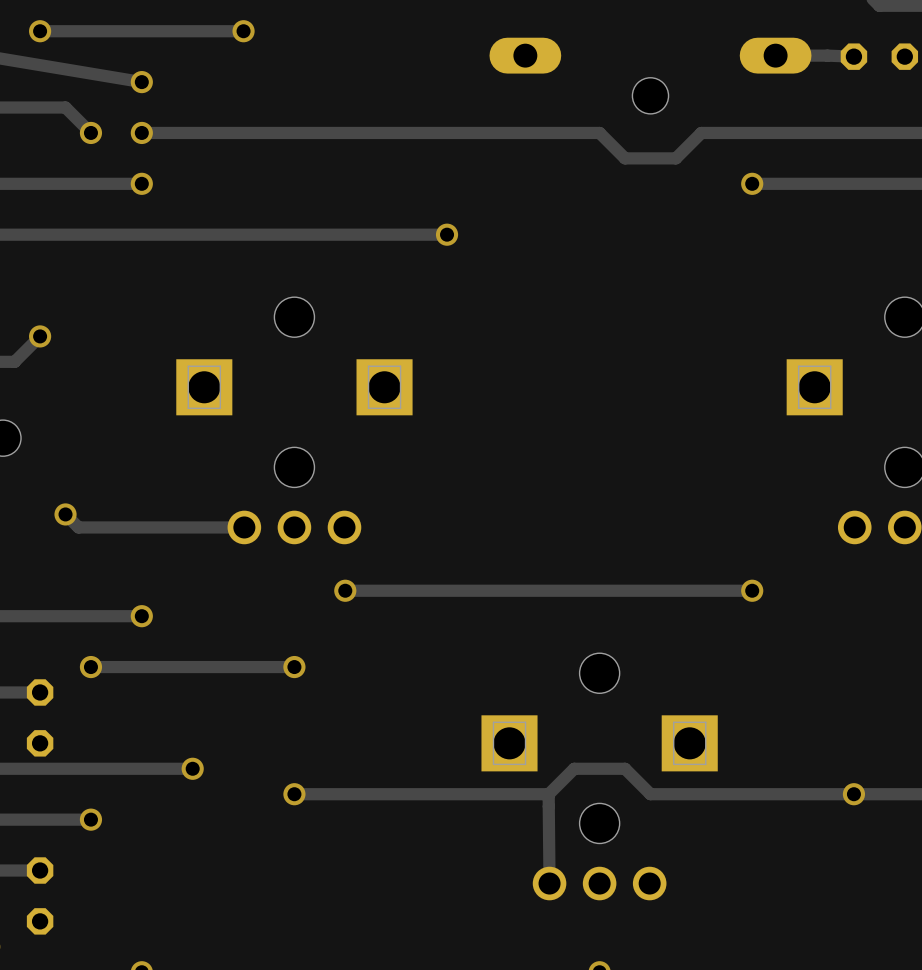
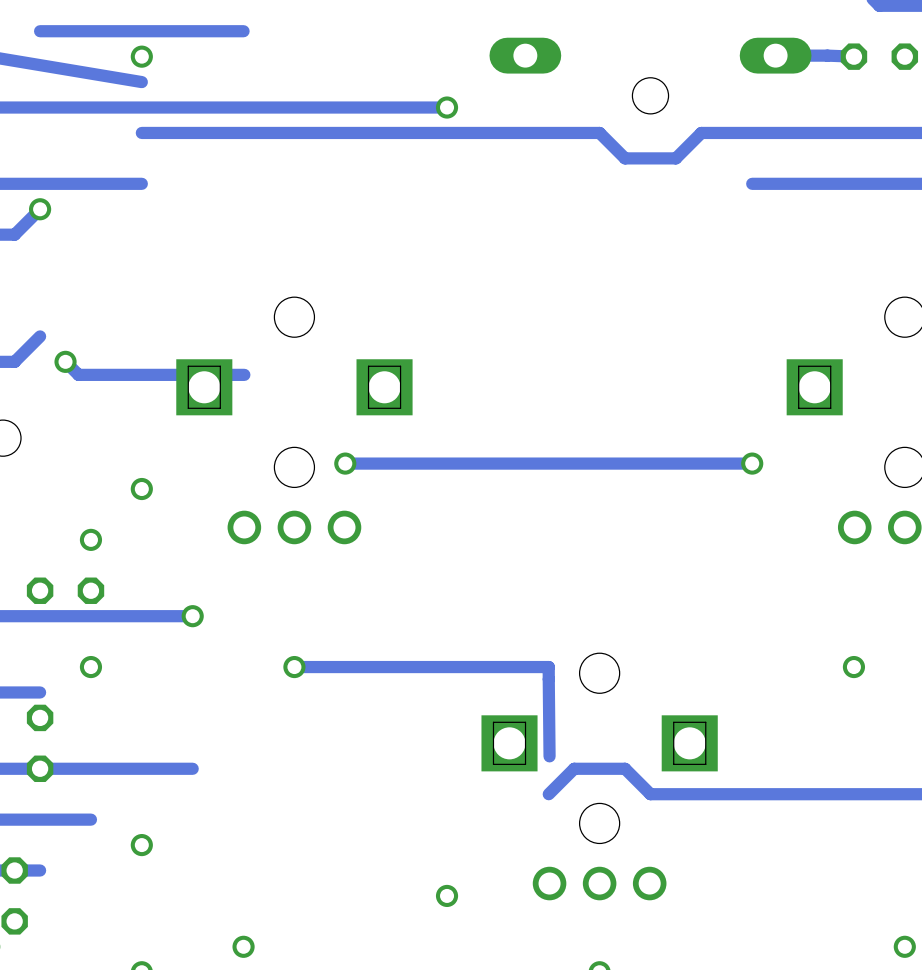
via: (40, 31) -> none
via: (243, 31) -> none
via position: (141, 82) -> (141, 56)
track: (65, 107) (90, 132) -> (65, 107) (447, 107)
via: none -> (447, 107)
via: (90, 132) -> none
via: (141, 132) -> none
via: (141, 183) -> none
via: (752, 183) -> none
via: none -> (40, 209)
track: (447, 234) (14, 234) -> (40, 209) (14, 234)
via: (447, 234) -> none
via position: (40, 336) -> (65, 361)
via: none -> (345, 463)
via: none -> (752, 463)
via: none -> (141, 489)
track: (65, 514) (78, 527) (244, 527) -> (65, 361) (78, 374) (244, 374)
via position: (65, 514) -> (90, 539)
part: none -> (65, 590)
via: (345, 590) -> none
track: (752, 590) (345, 590) -> (752, 463) (345, 463)
via: (752, 590) -> none
via: (141, 616) -> none
track: none -> (192, 616) (141, 616)
via: none -> (192, 616)
track: (294, 667) (90, 667) -> (294, 667) (548, 667) (549, 756)
via: none -> (853, 667)
part position: (40, 717) -> (40, 743)
via: (192, 768) -> none
track: (294, 794) (548, 794) (549, 883) -> none
via: (294, 794) -> none
via: (853, 794) -> none
via: (90, 819) -> none
via: none -> (141, 845)
part position: (40, 895) -> (14, 895)
via: none -> (447, 895)
via: none -> (243, 946)
via: none -> (904, 946)

